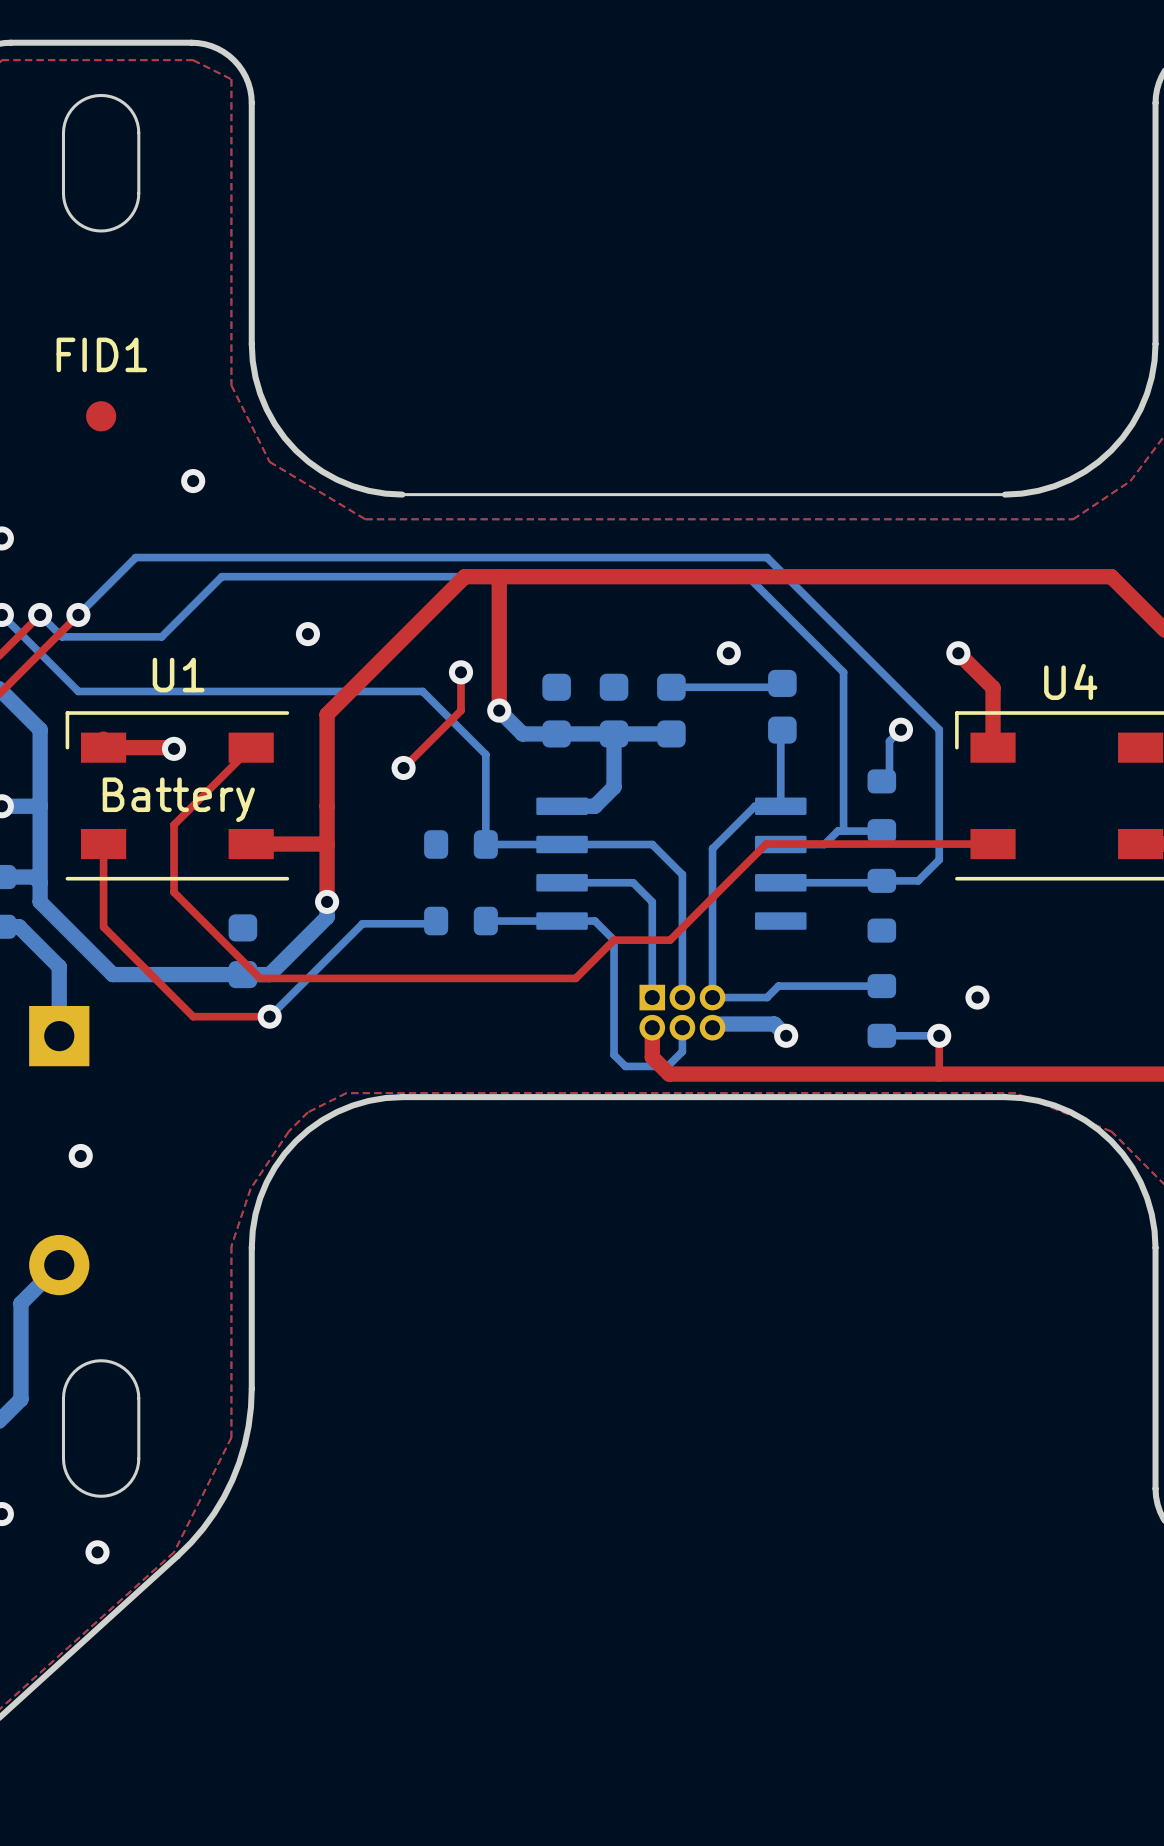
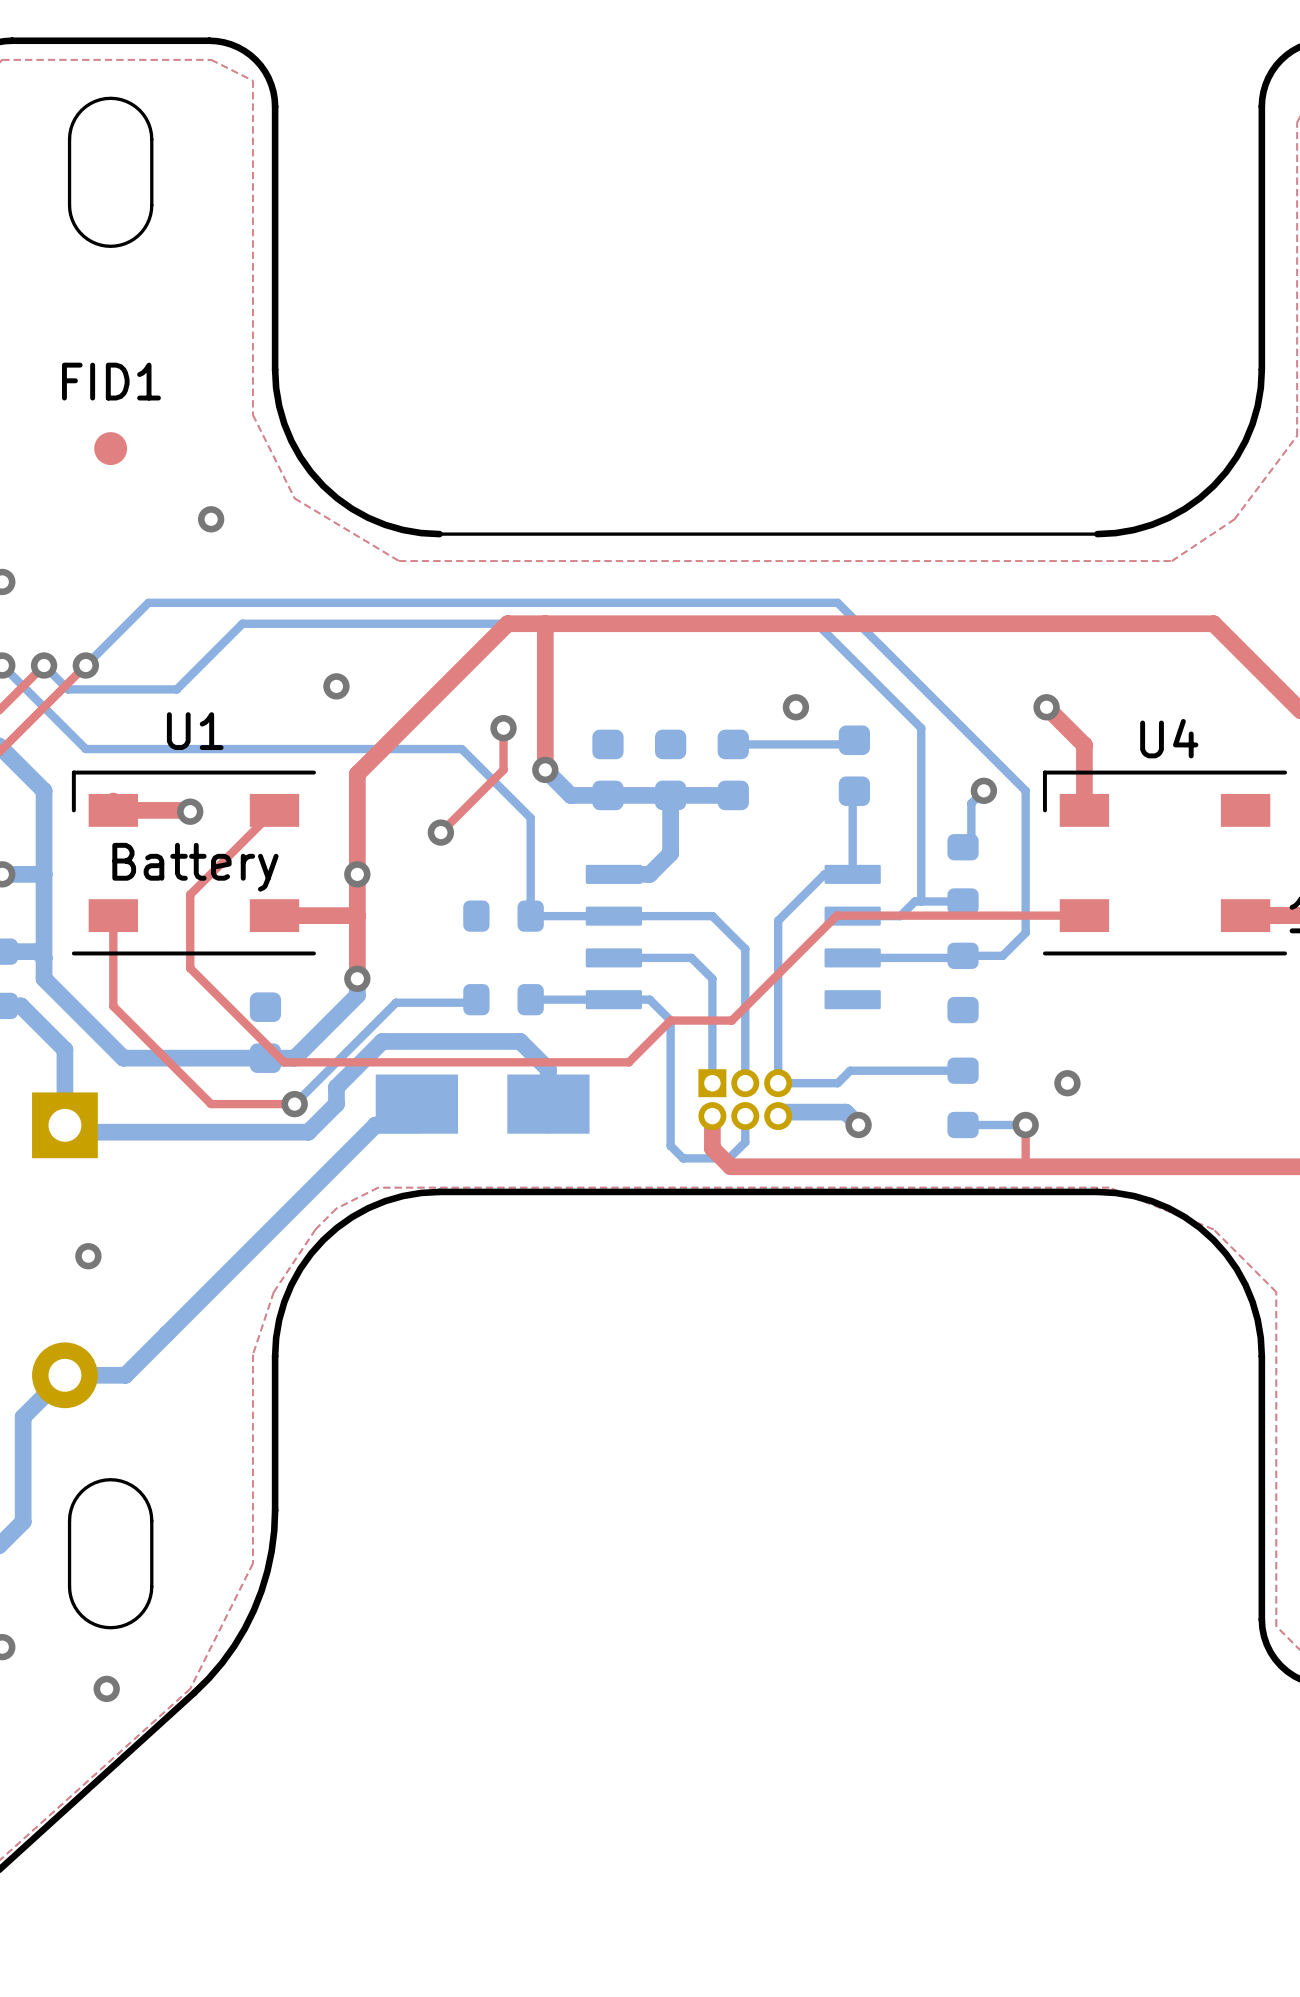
via: none -> (357, 874)
part: none -> (482, 1104)
bottom track: none -> (548, 1104) (548, 1069) (520, 1041) (382, 1041) (336, 1087) (336, 1104) (308, 1132) (71, 1132)
bottom track: none -> (416, 1124) (375, 1124) (125, 1375) (64, 1375)

